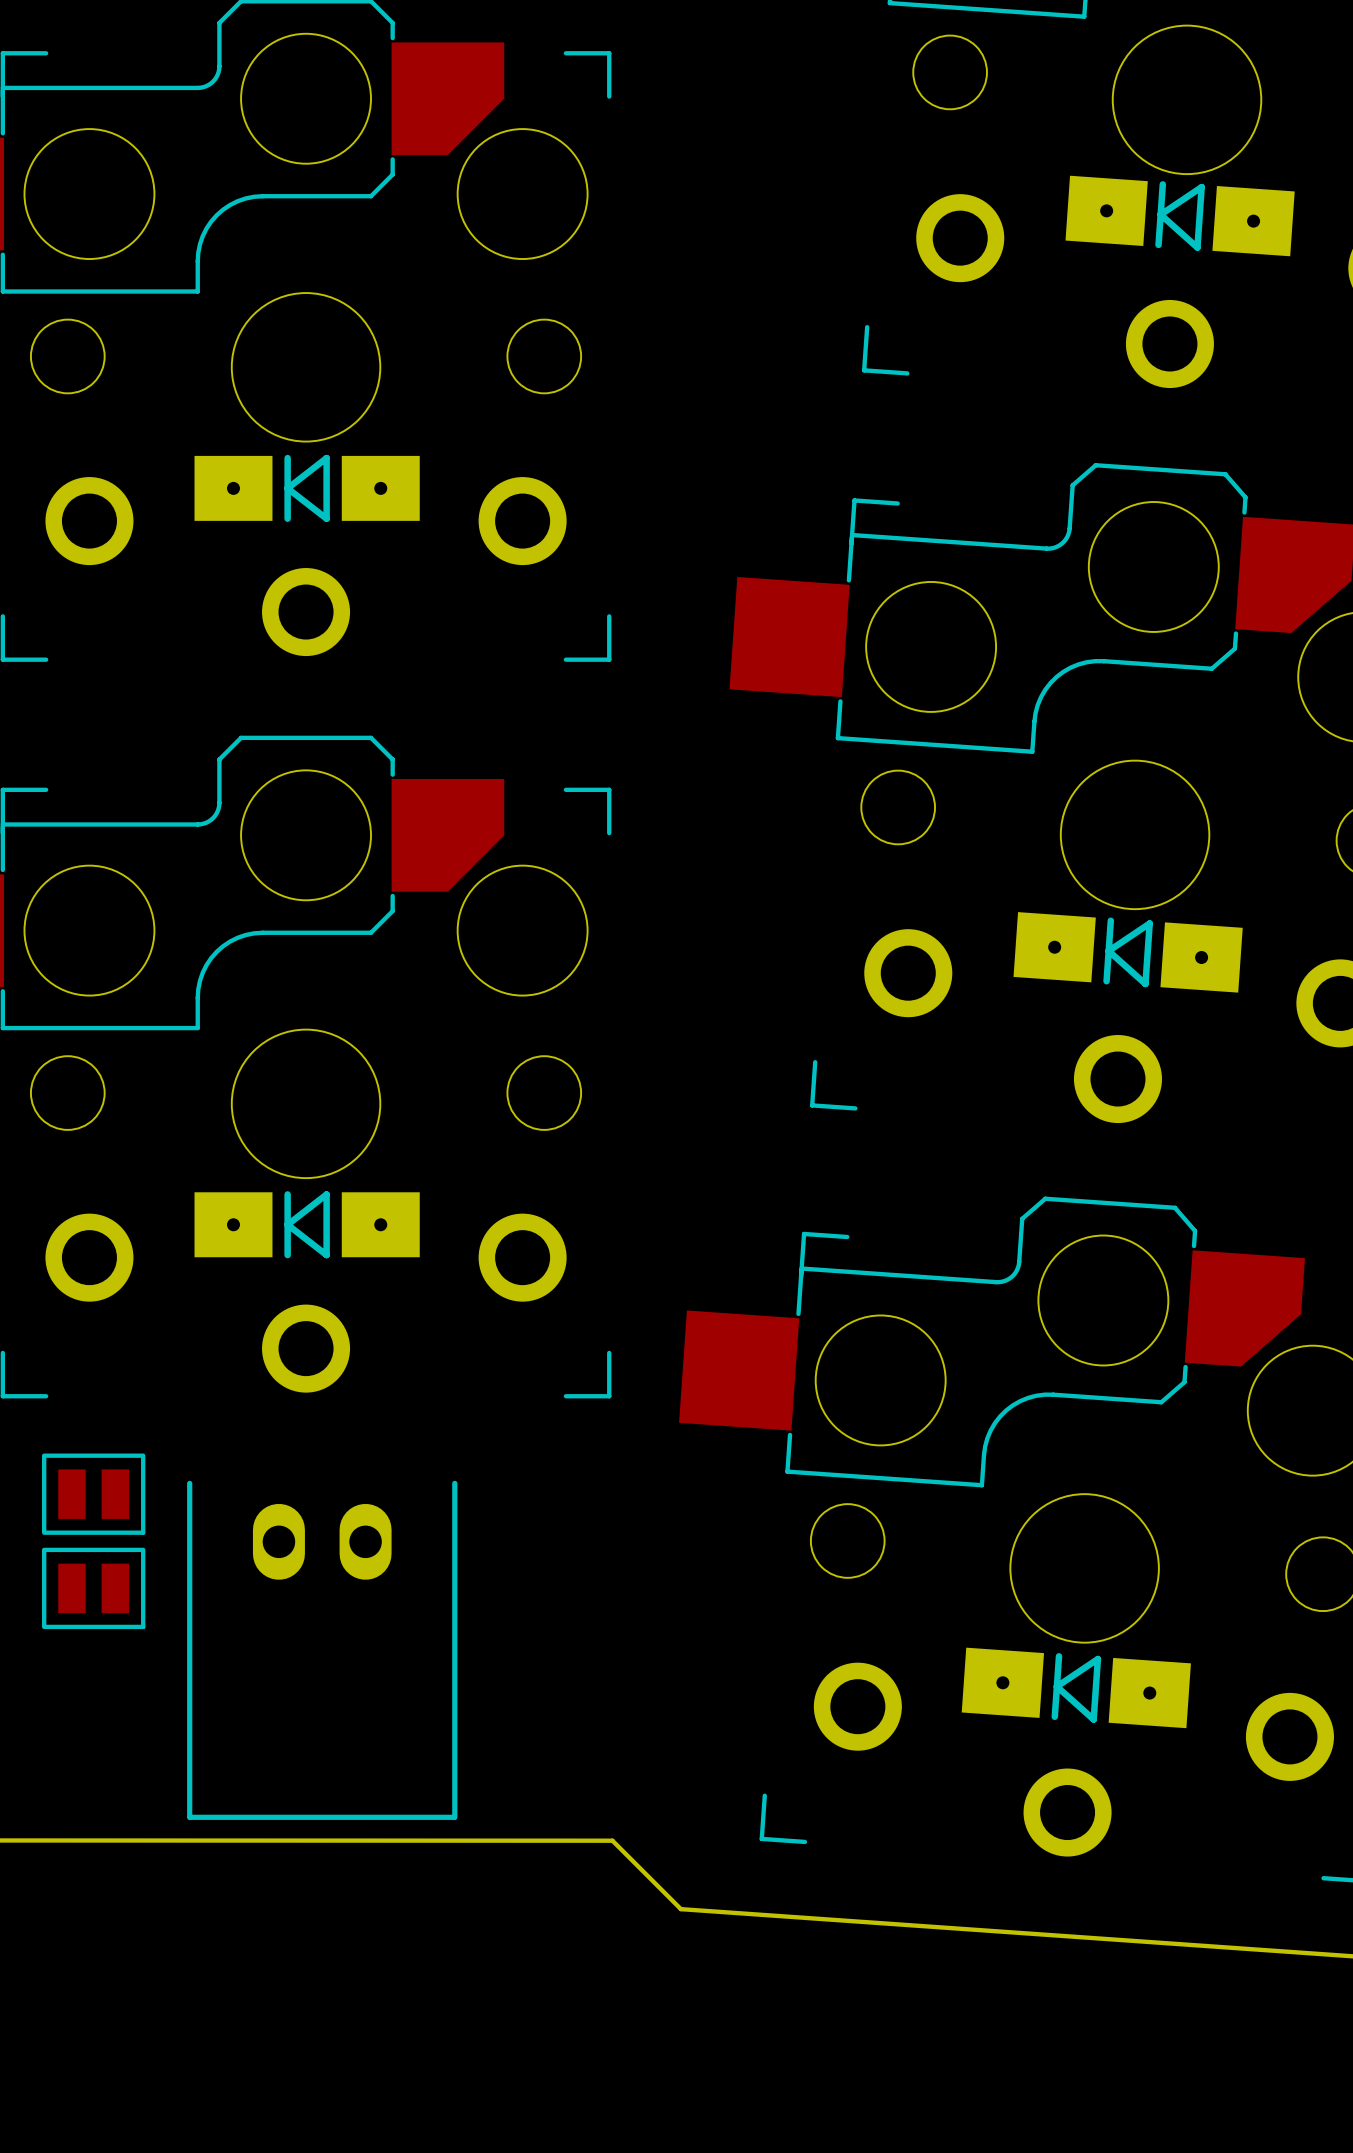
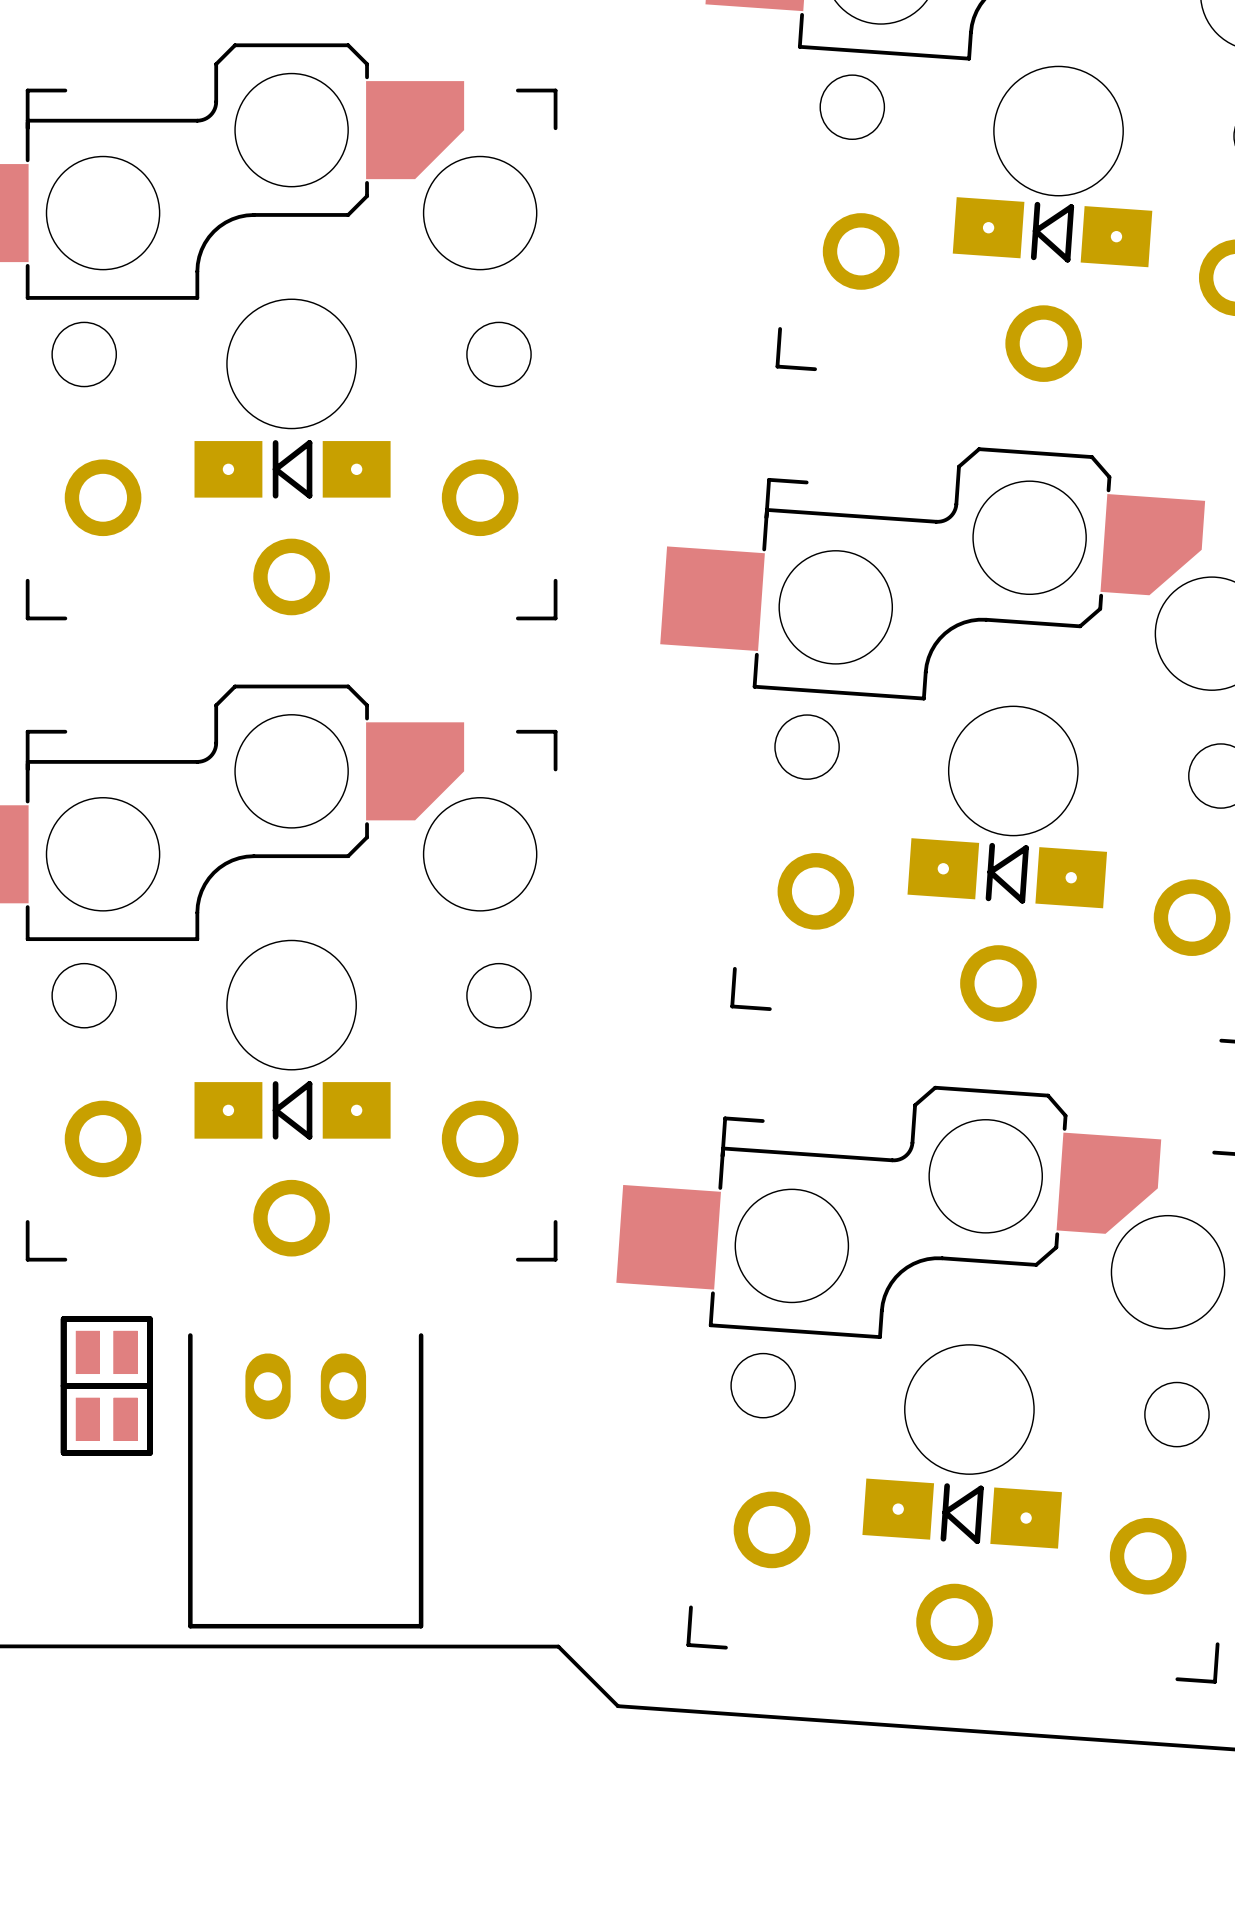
part footprint: [42, 1453, 146, 1535] -> [60, 1316, 153, 1389]
part footprint: [42, 1547, 146, 1630] -> [60, 1383, 153, 1456]

